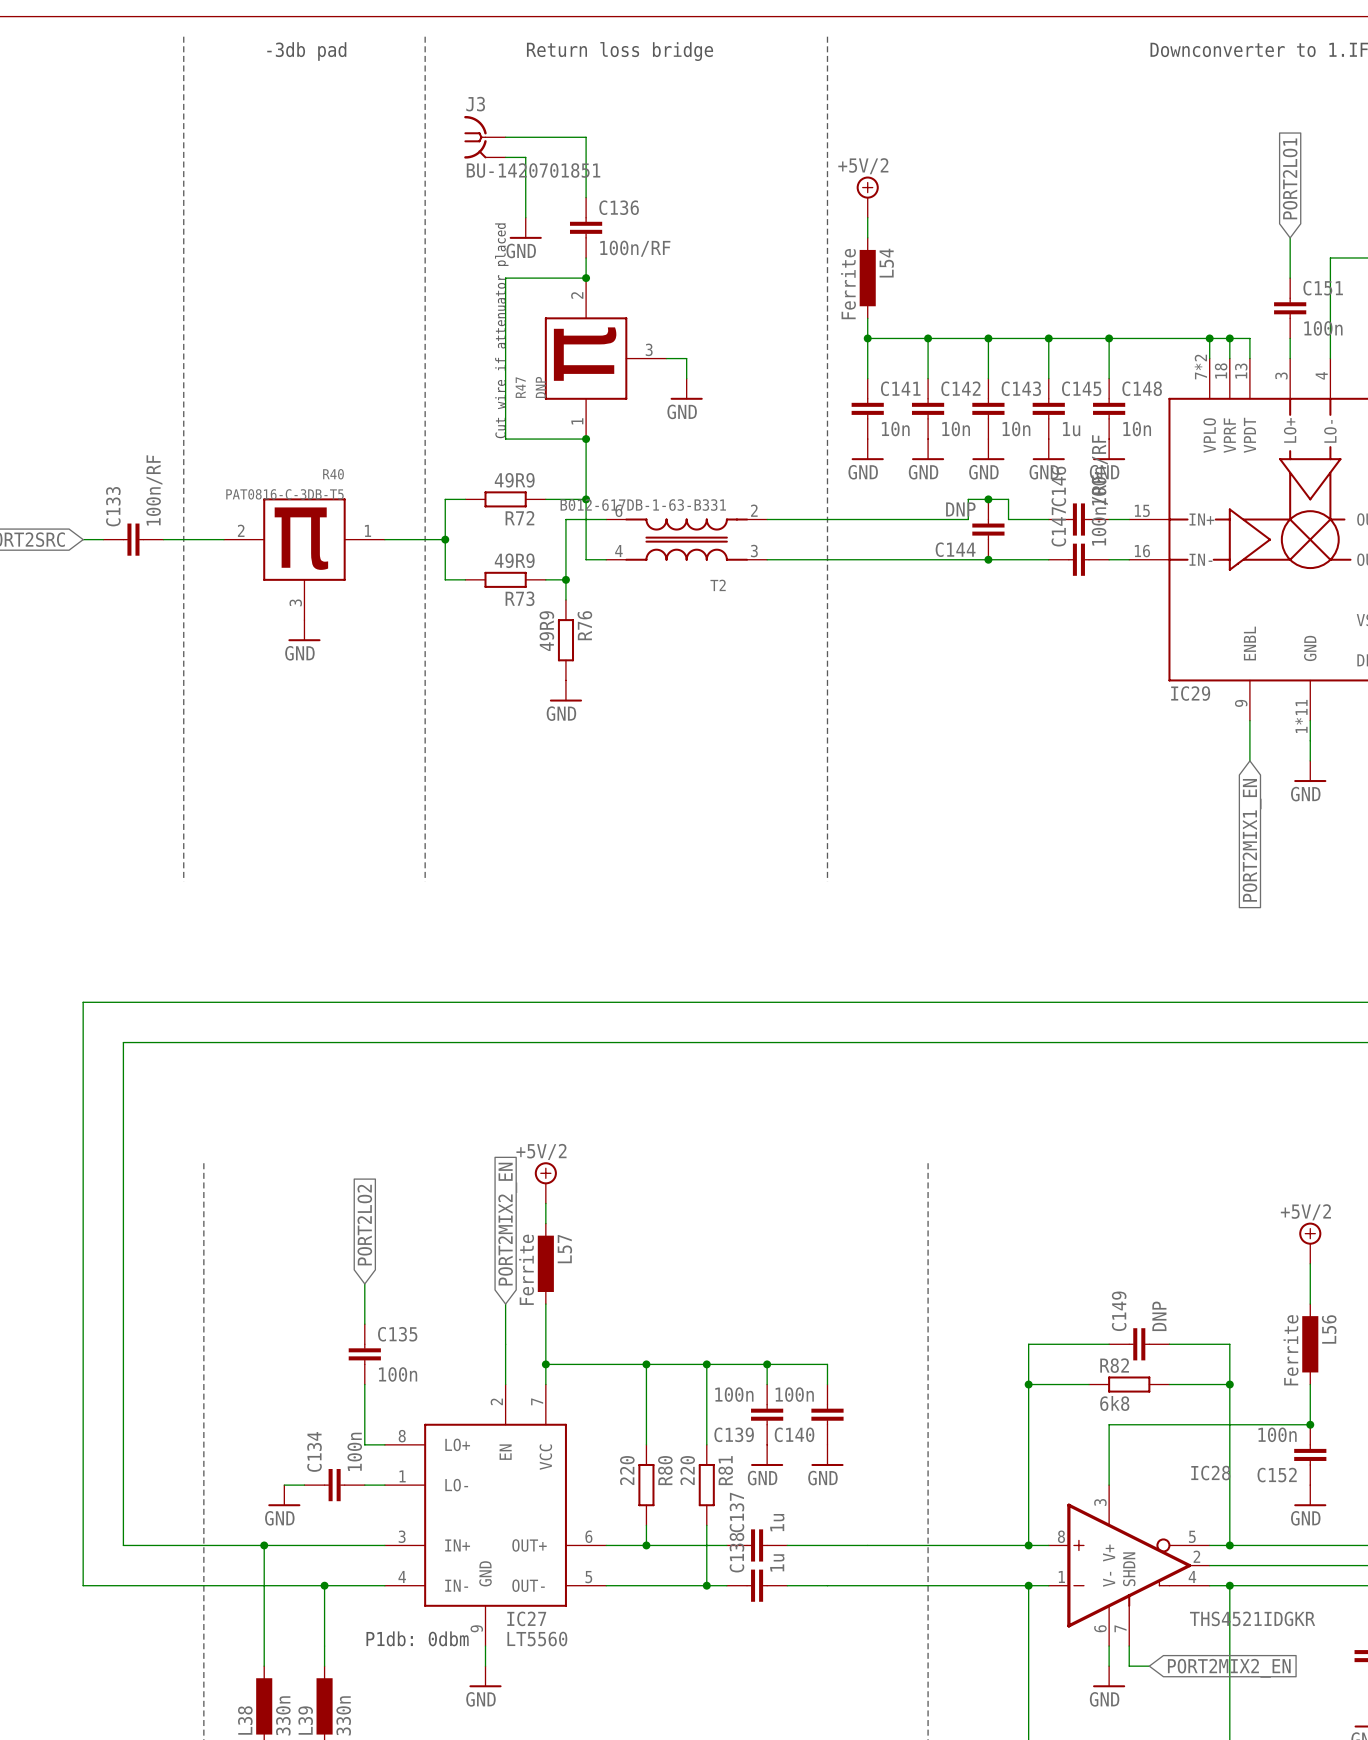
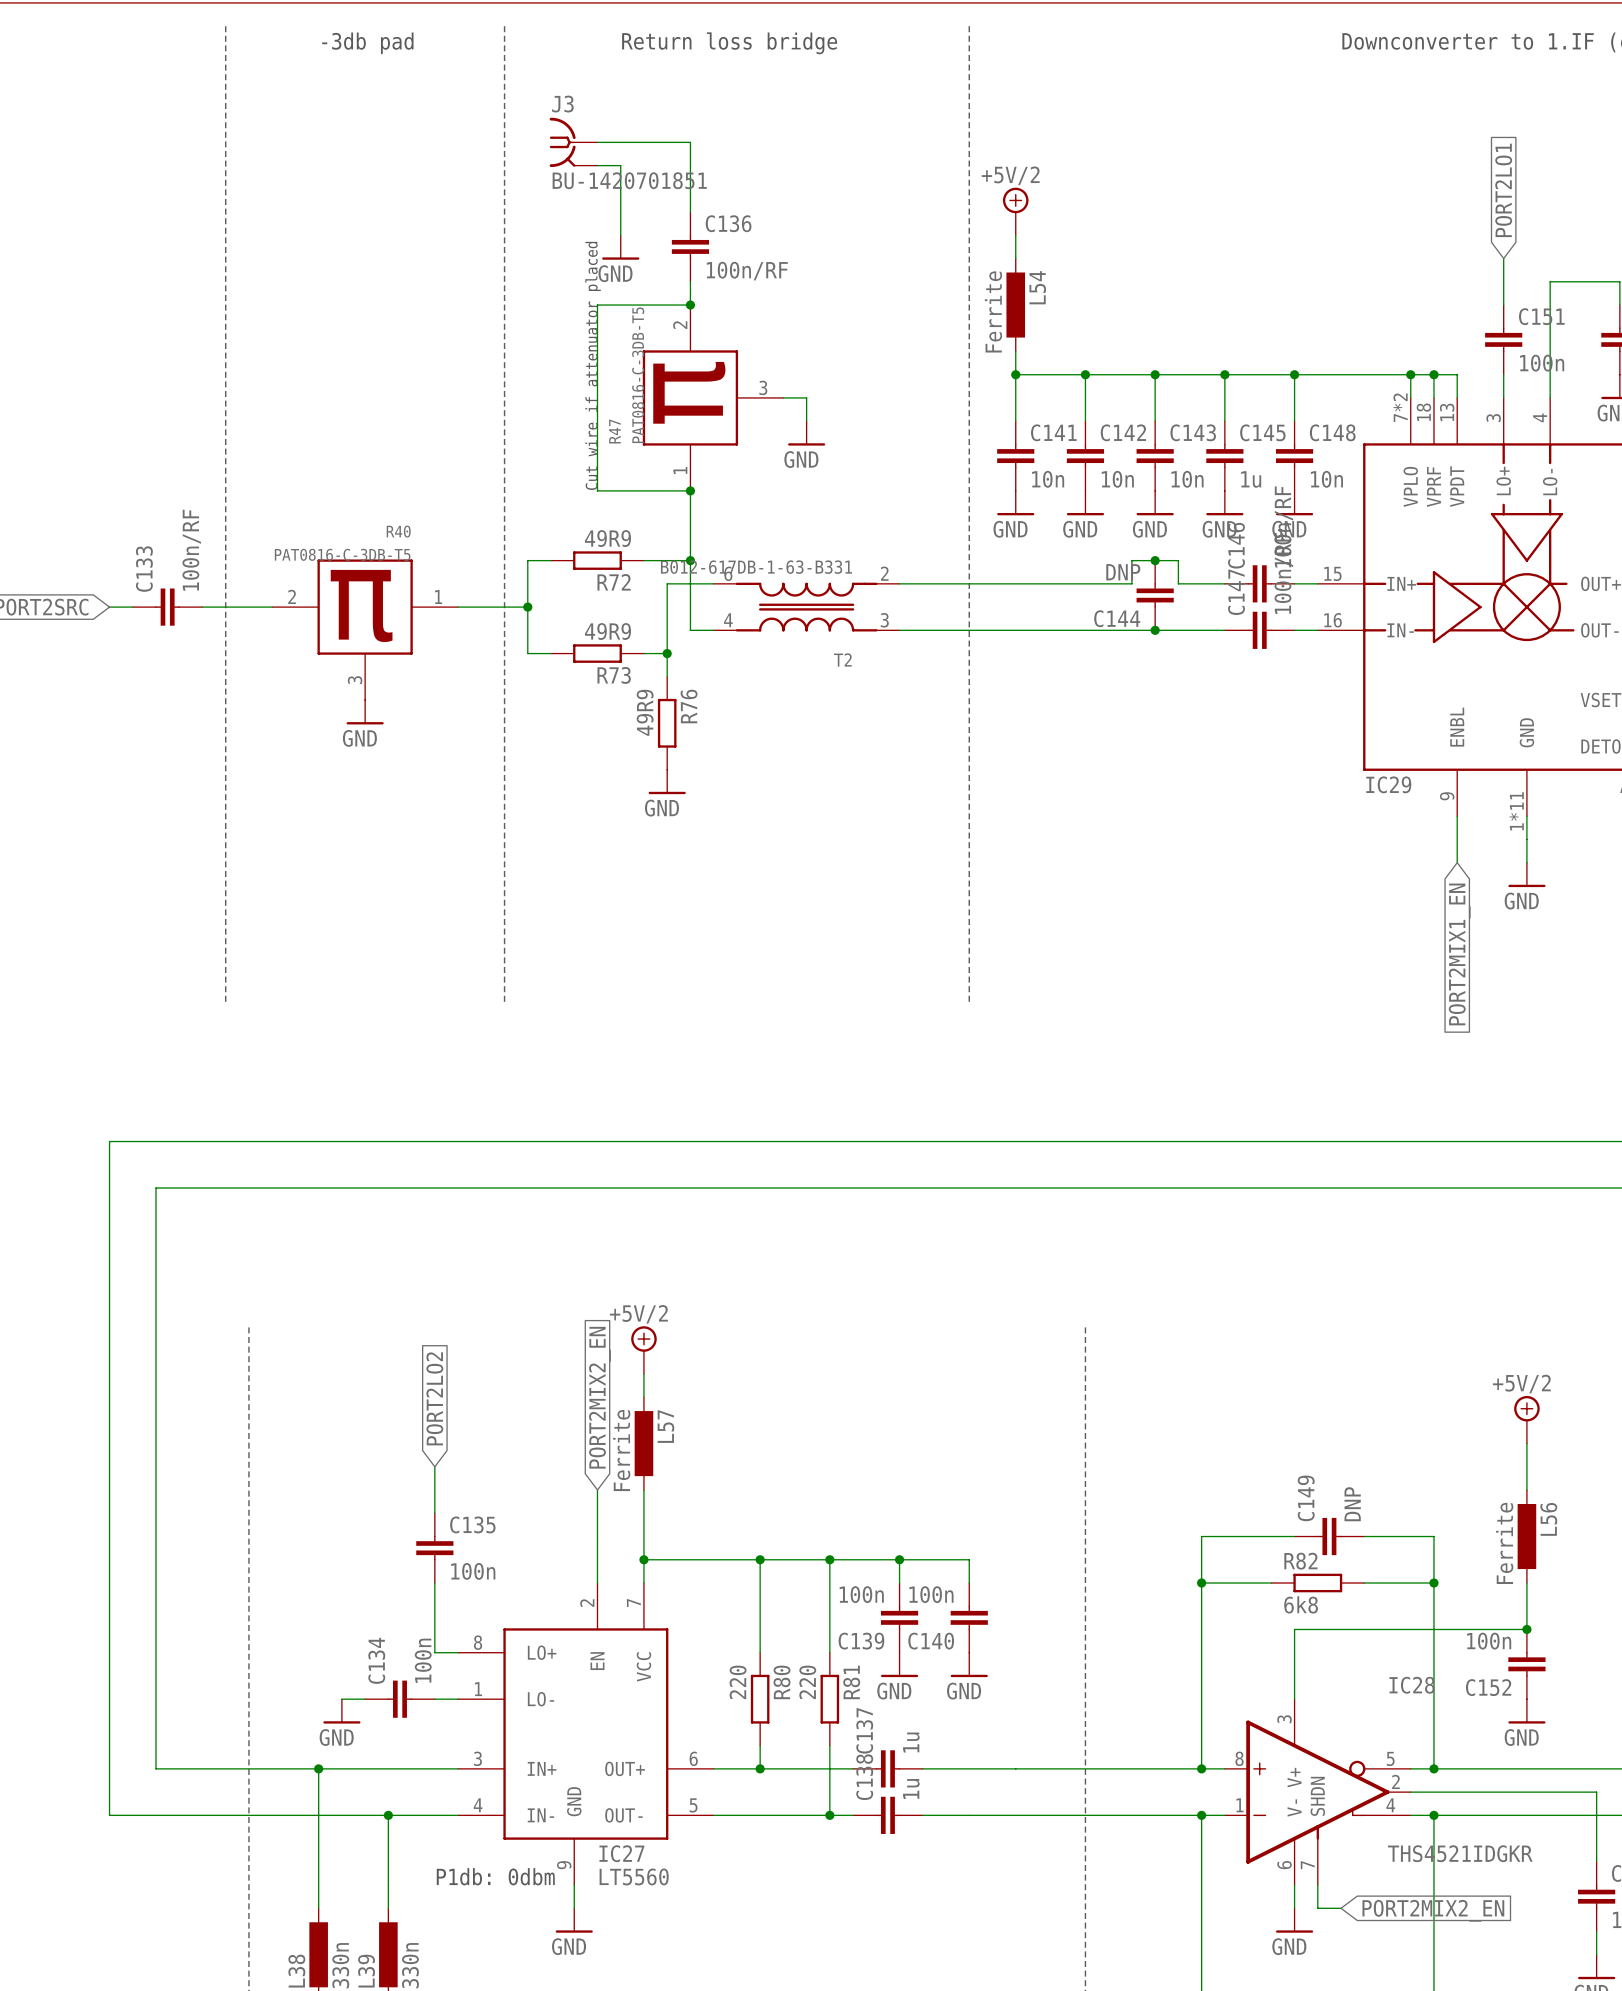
R47 value: DNP (540, 387) -> PAT0816-C-3DB-T5 (638, 375)

